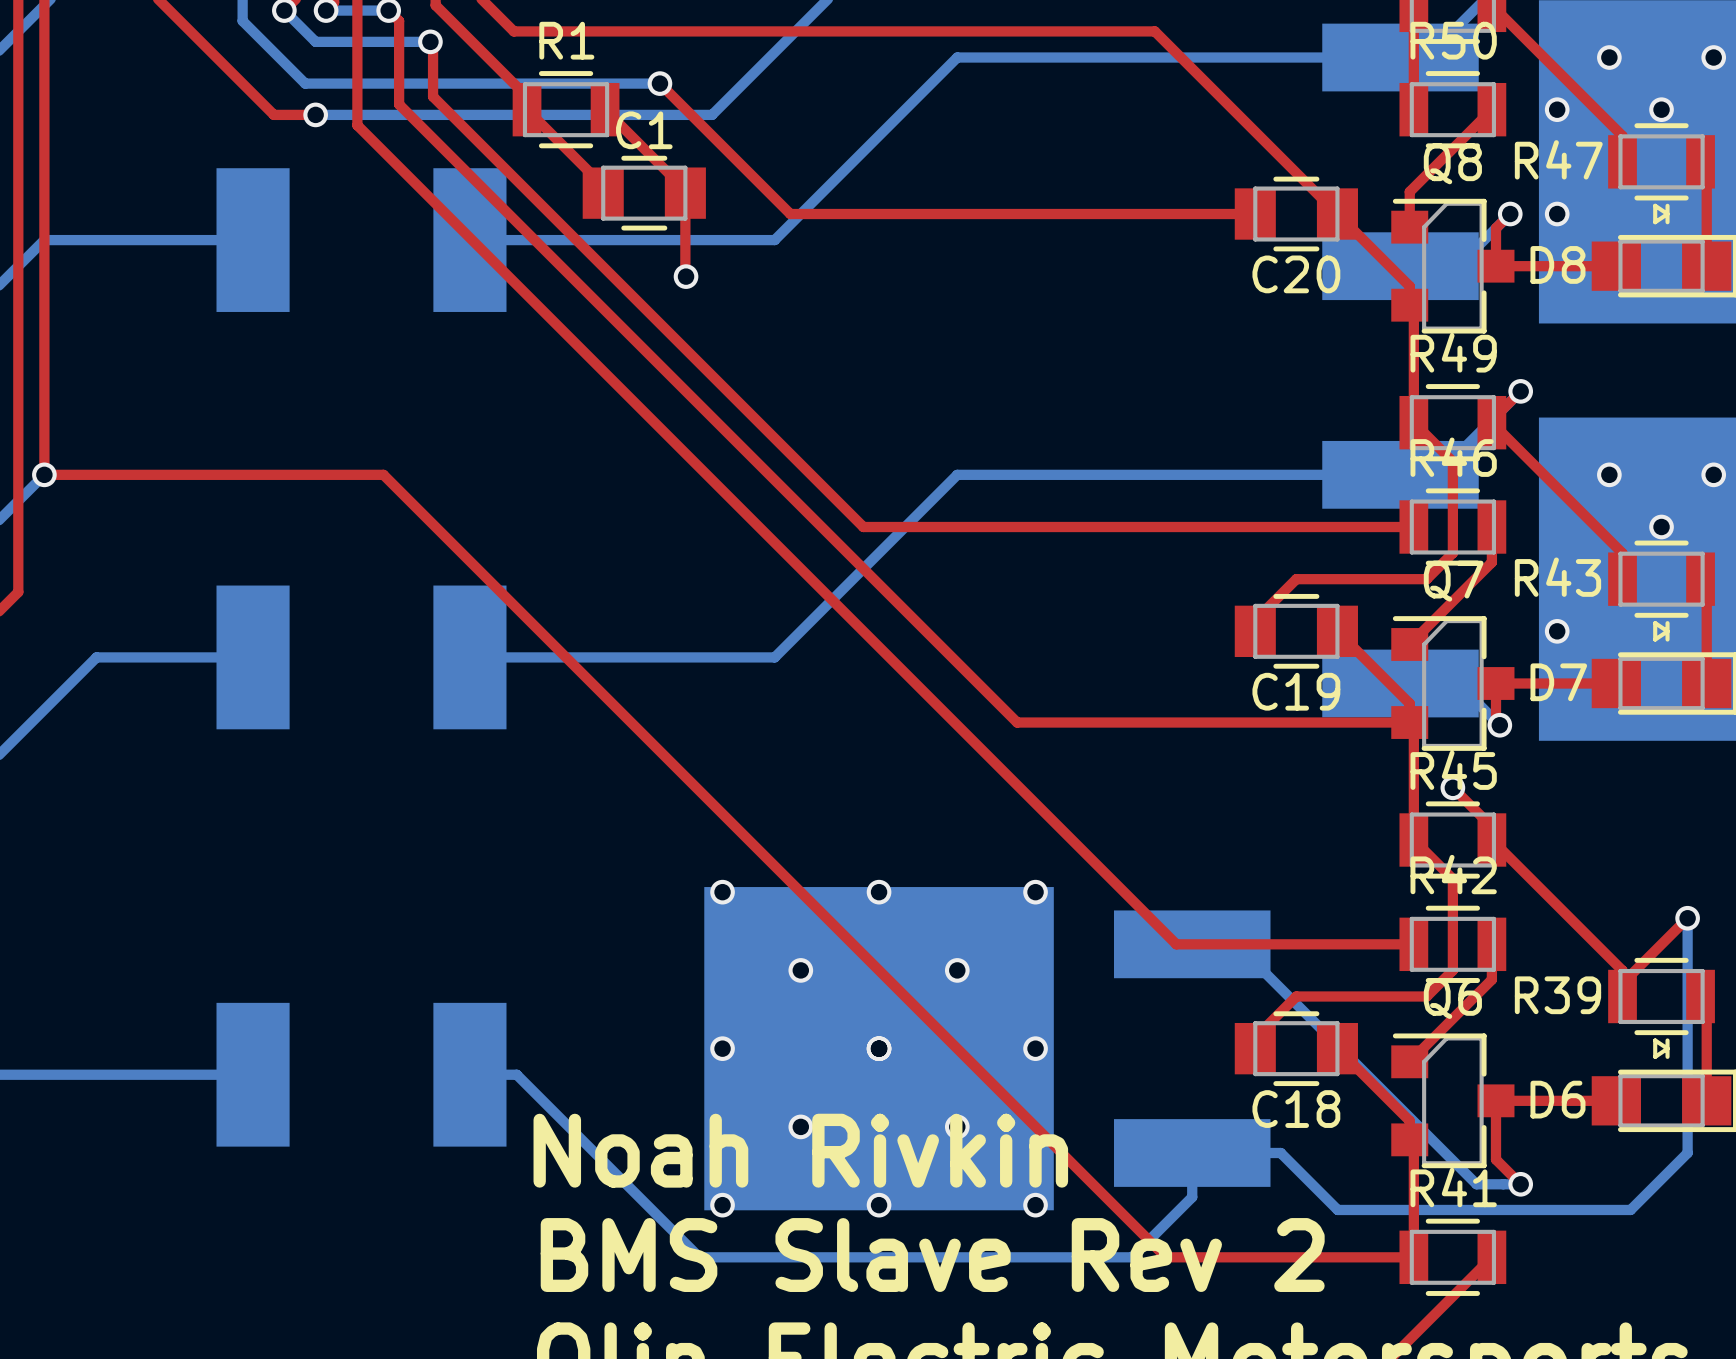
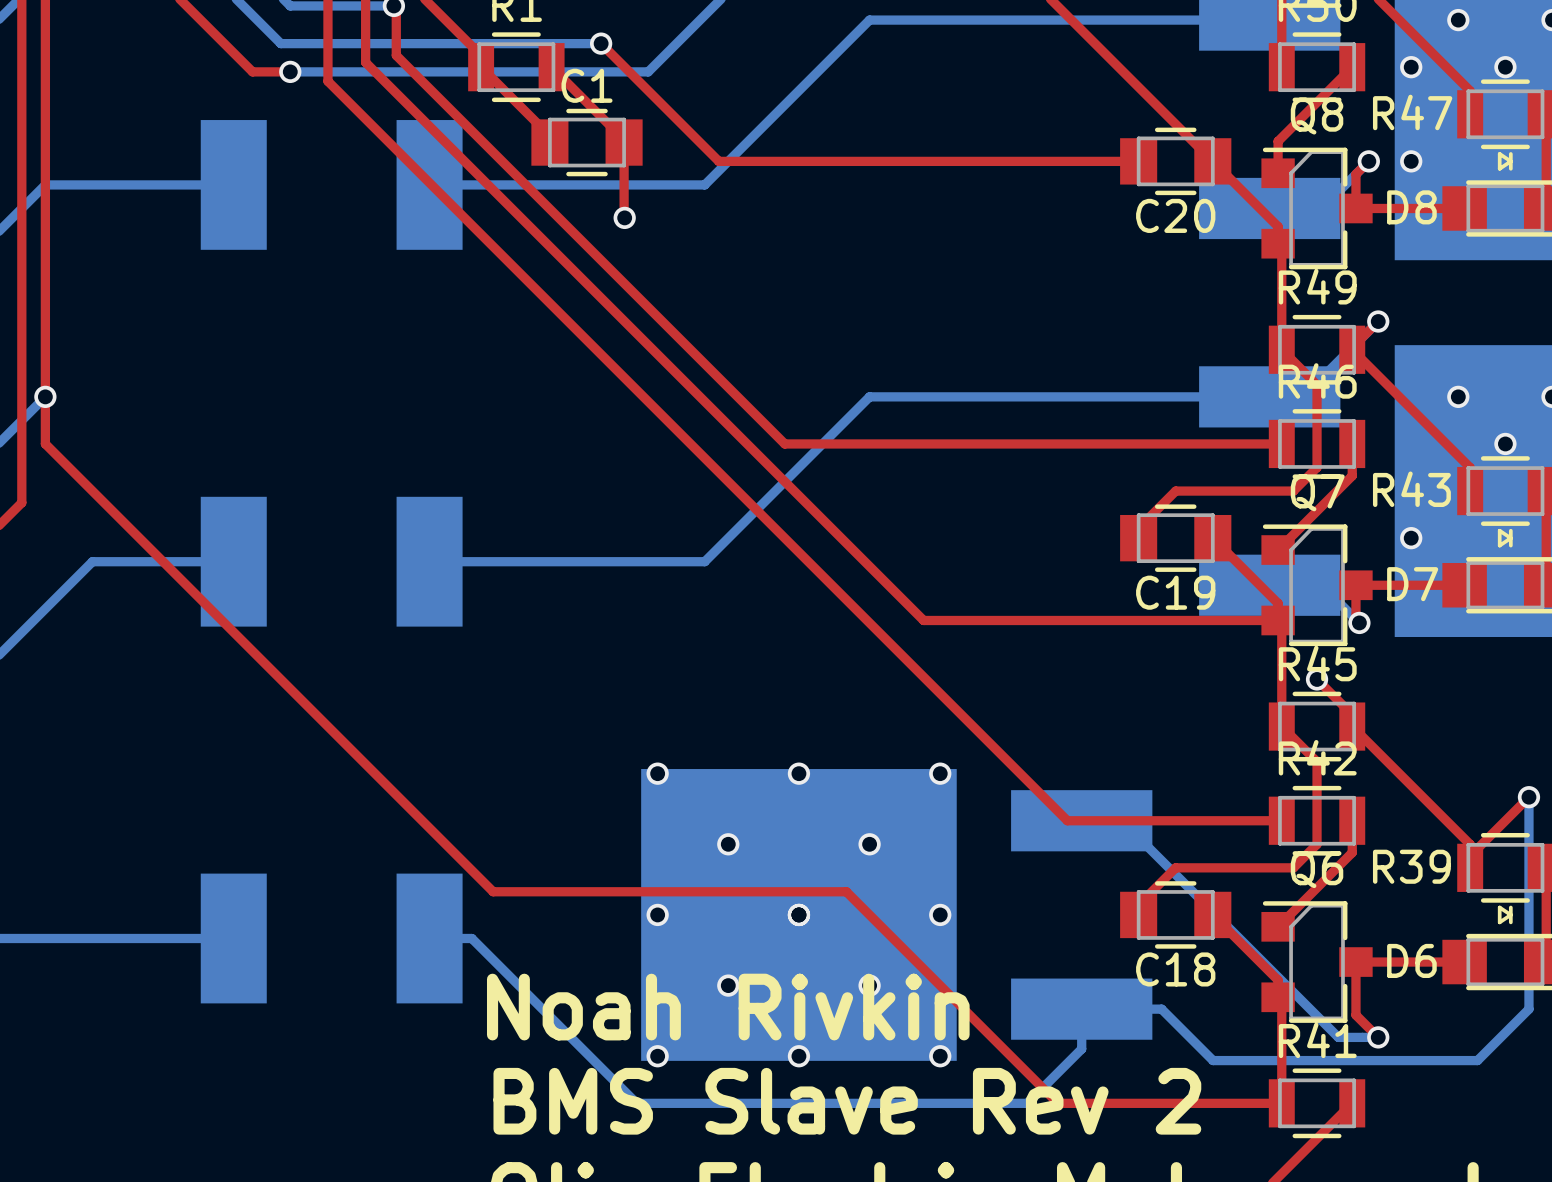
top track: (44, 474) (383, 474) (931, 1022) -> (45, 396) (45, 443) (493, 891) (846, 891)

